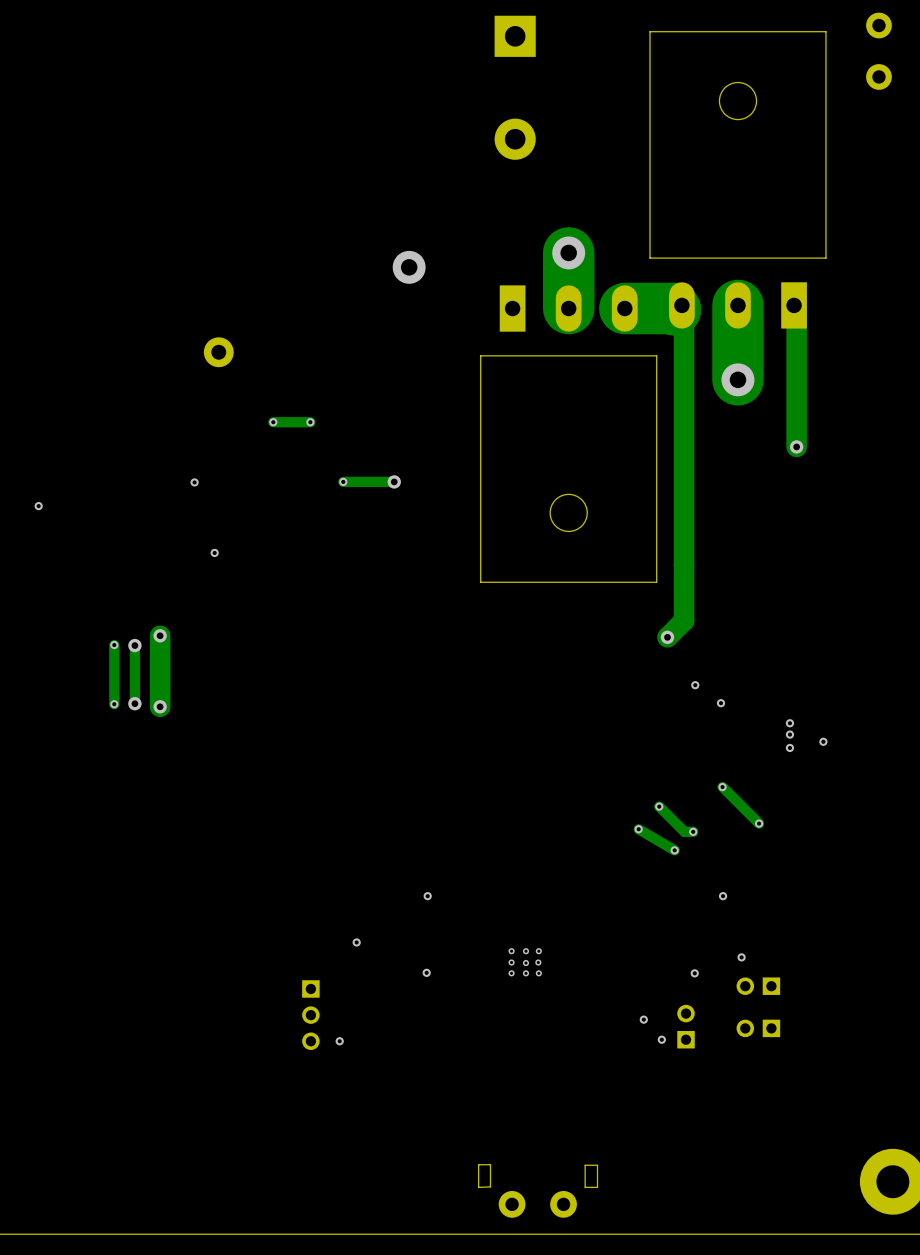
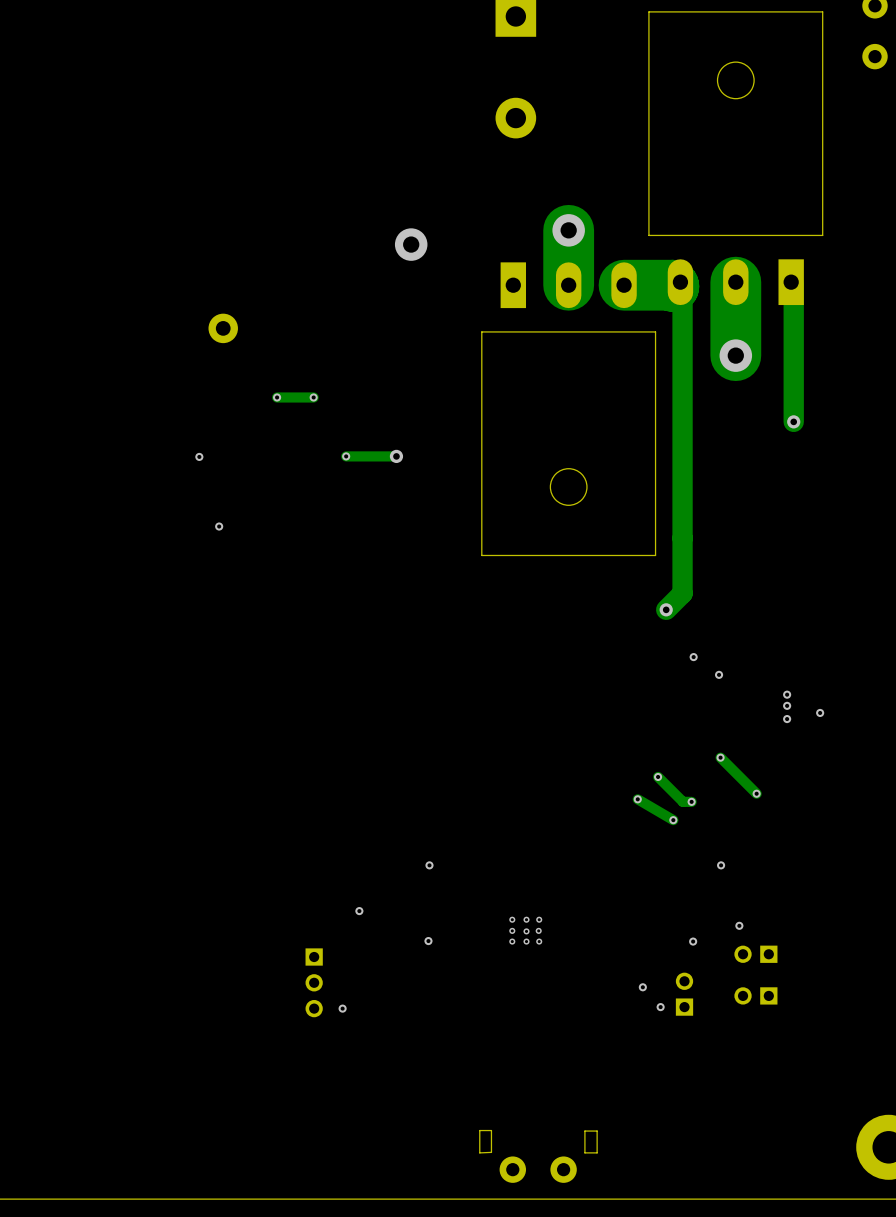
via: (38, 506) -> none
track: (160, 635) (160, 706) -> none
via: (160, 635) -> none
track: (114, 645) (114, 704) -> none
via: (114, 645) -> none
track: (134, 645) (134, 703) -> none
via: (134, 645) -> none
via: (134, 703) -> none
via: (114, 704) -> none
via: (160, 706) -> none

